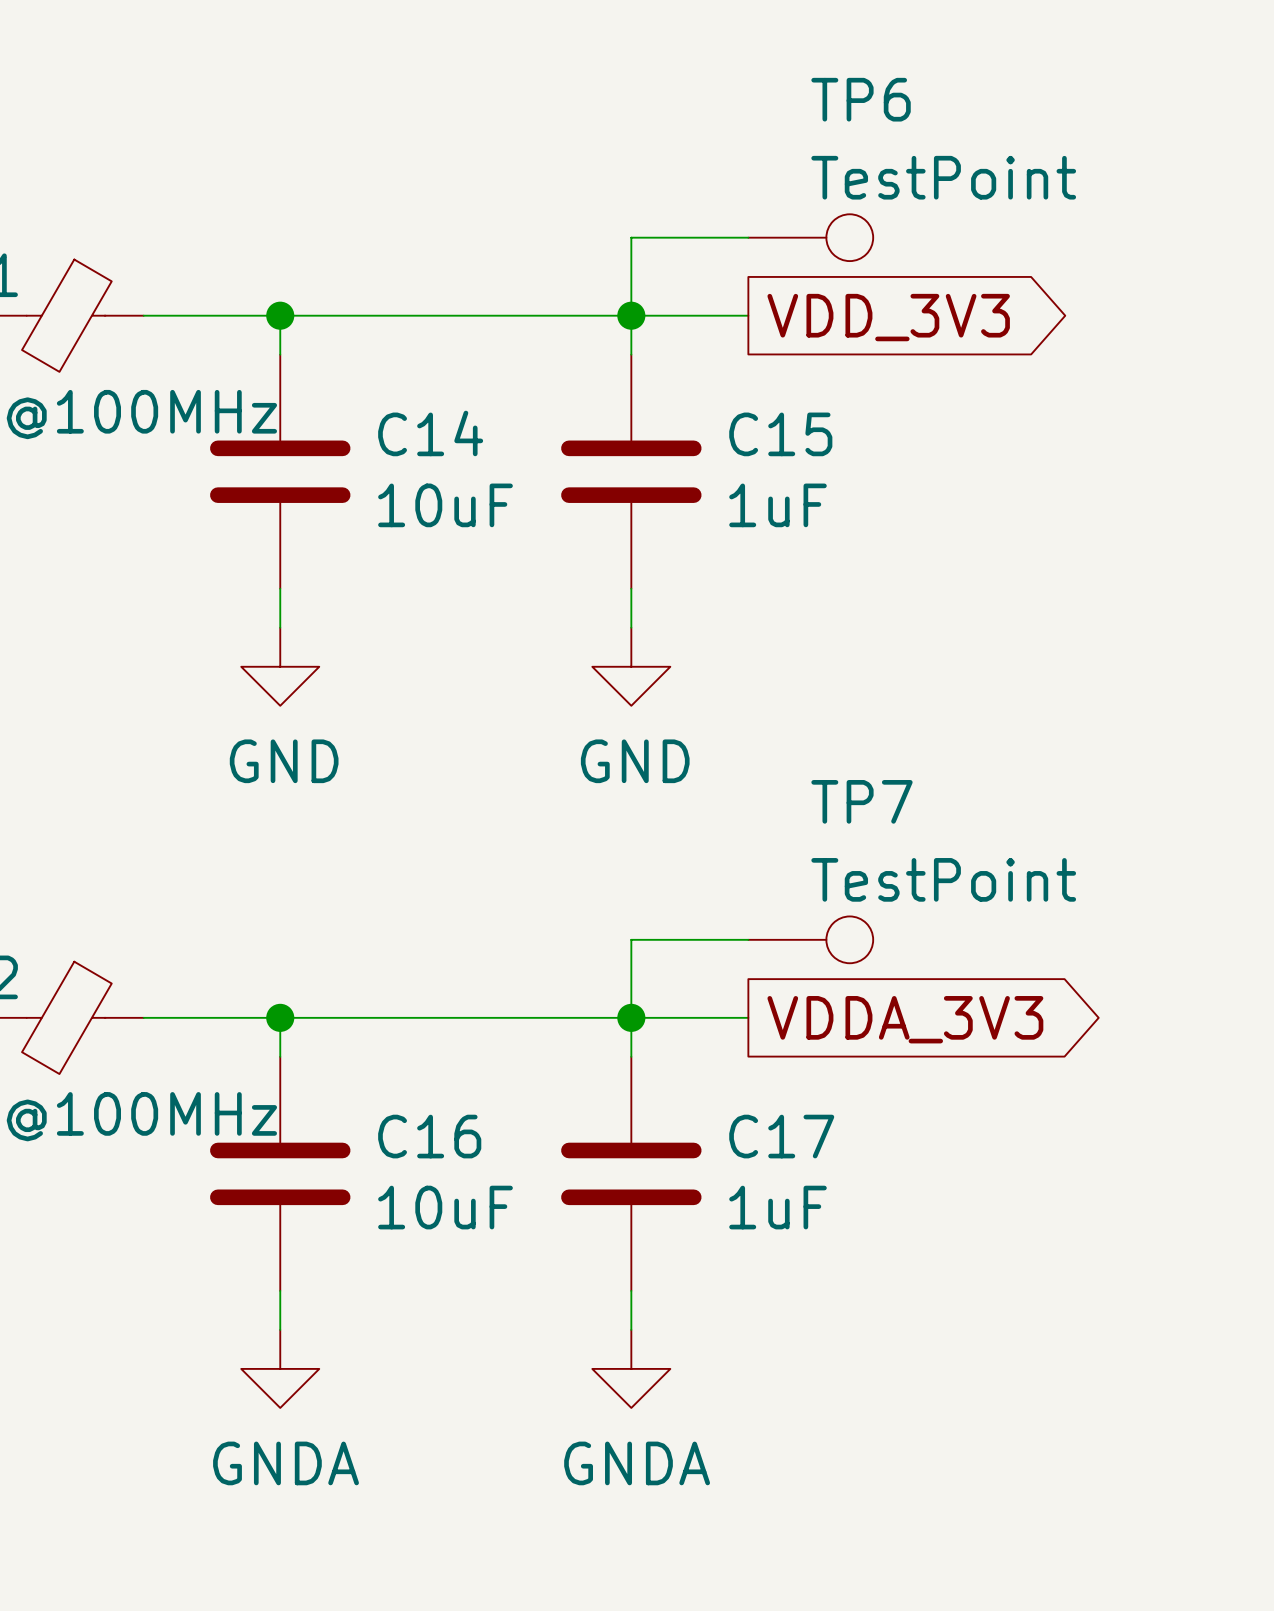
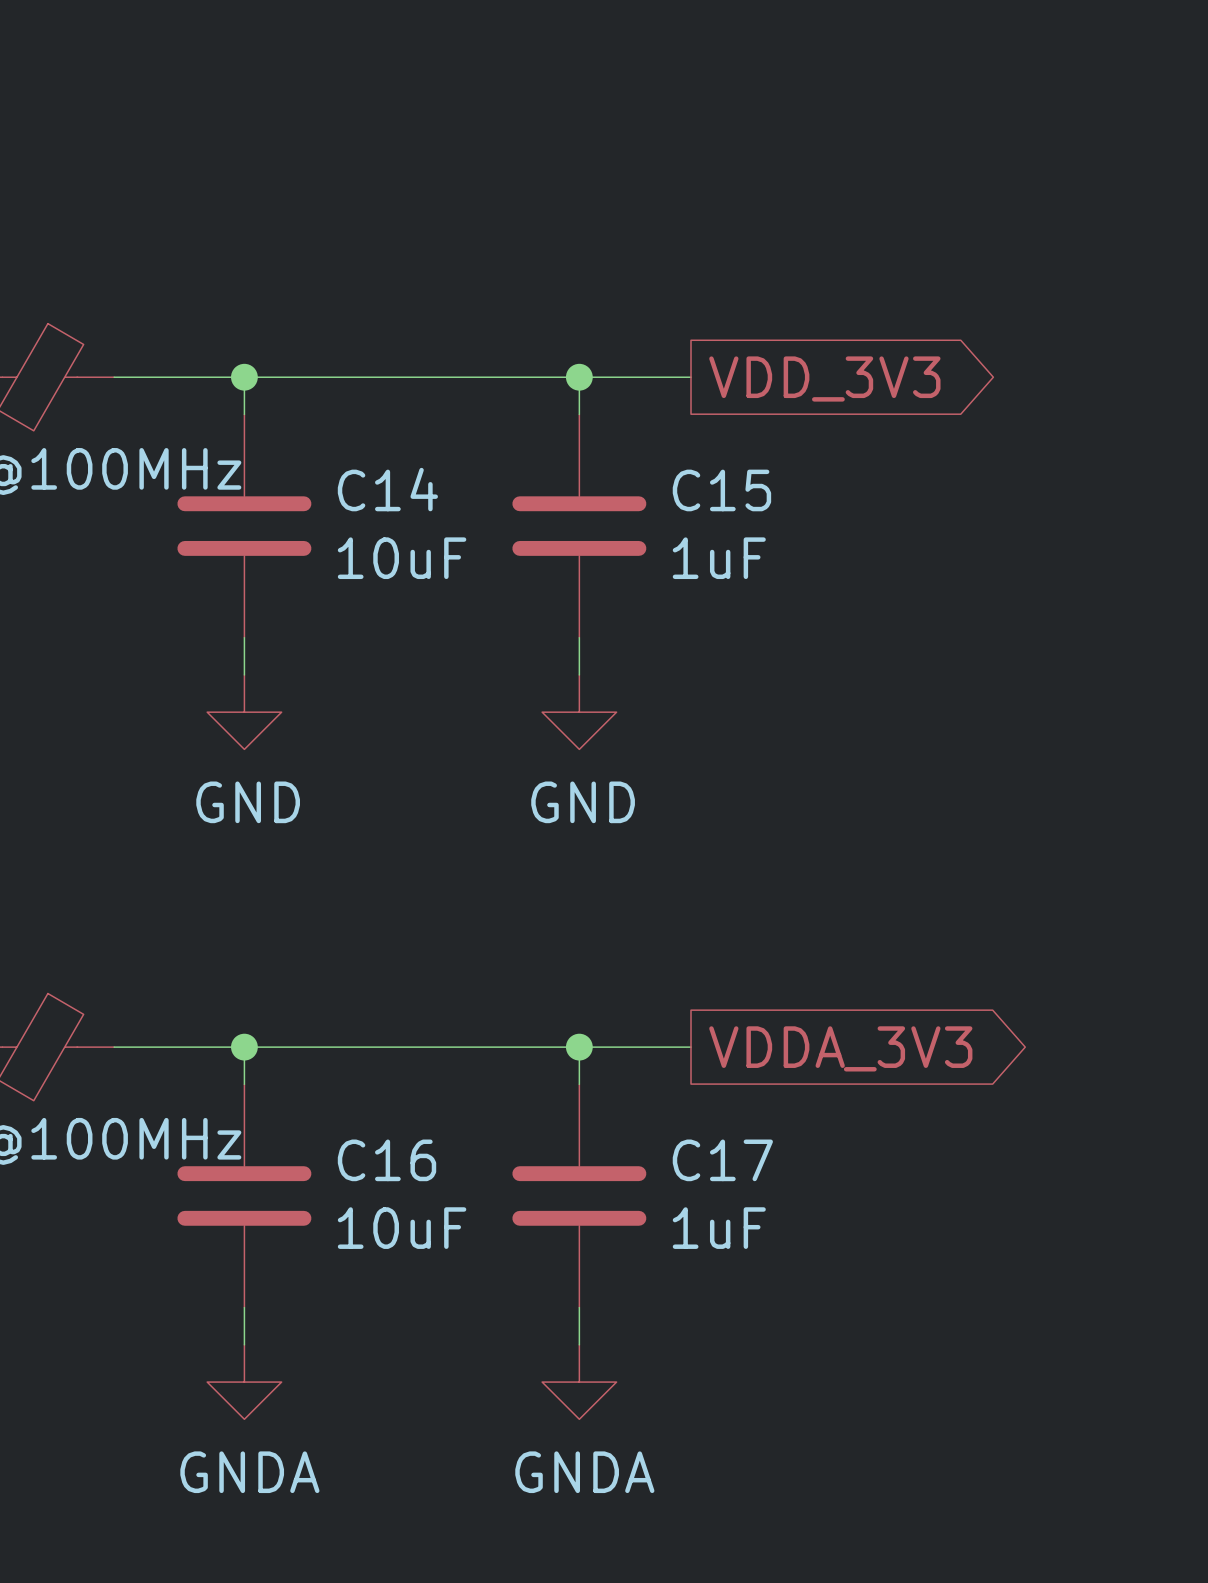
wire: (748, 237) (631, 237) (631, 315) -> none
TP6: TestPoint (810, 237) -> none
wire: (748, 939) (631, 939) (631, 1017) -> none
TP7: TestPoint (810, 939) -> none

